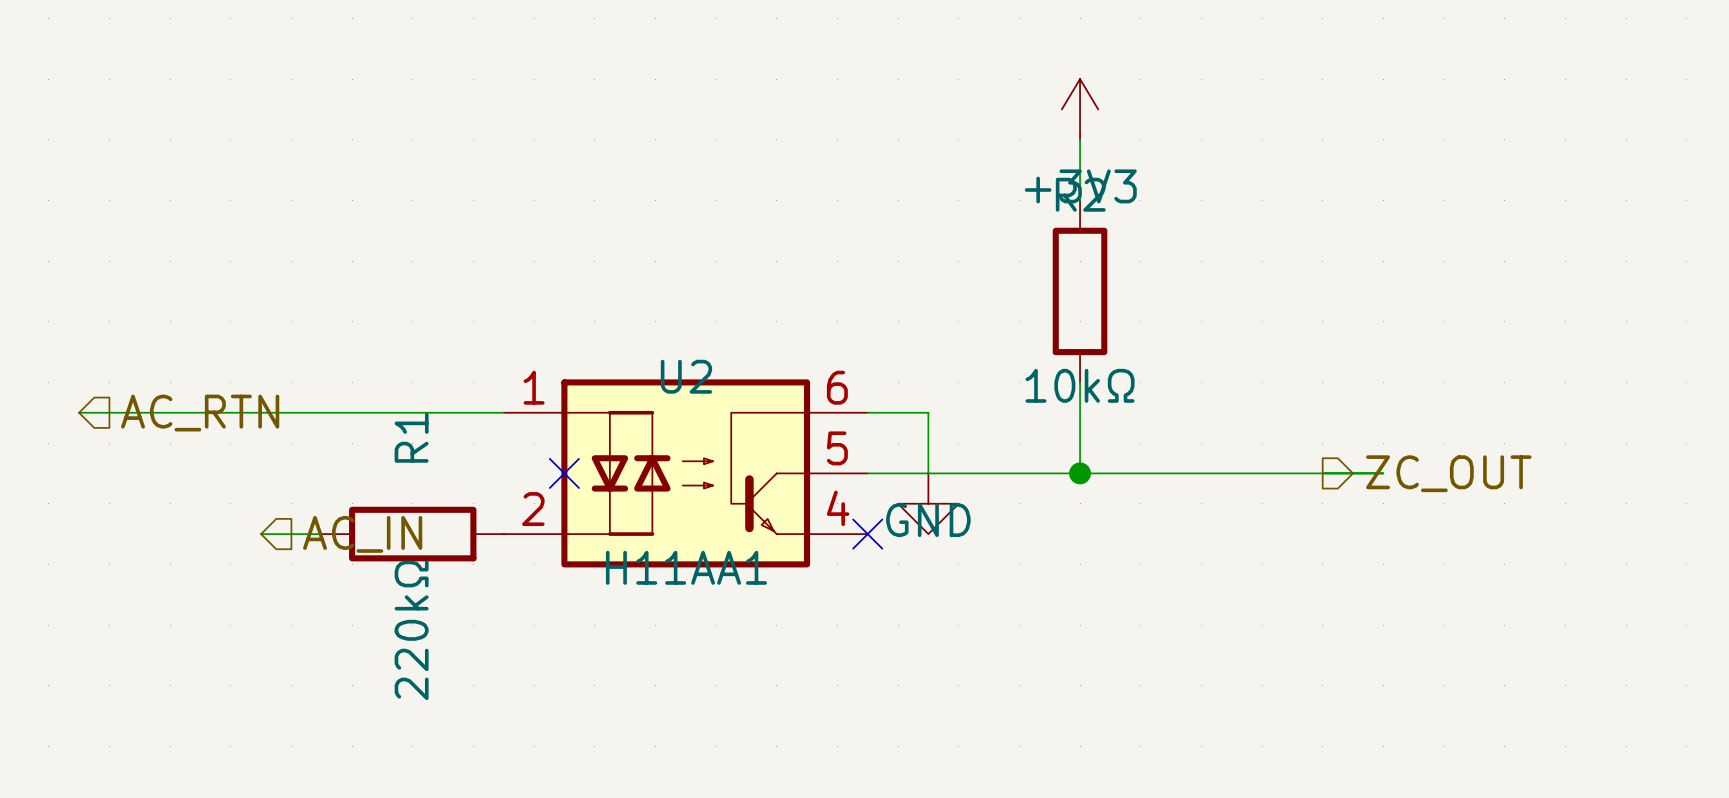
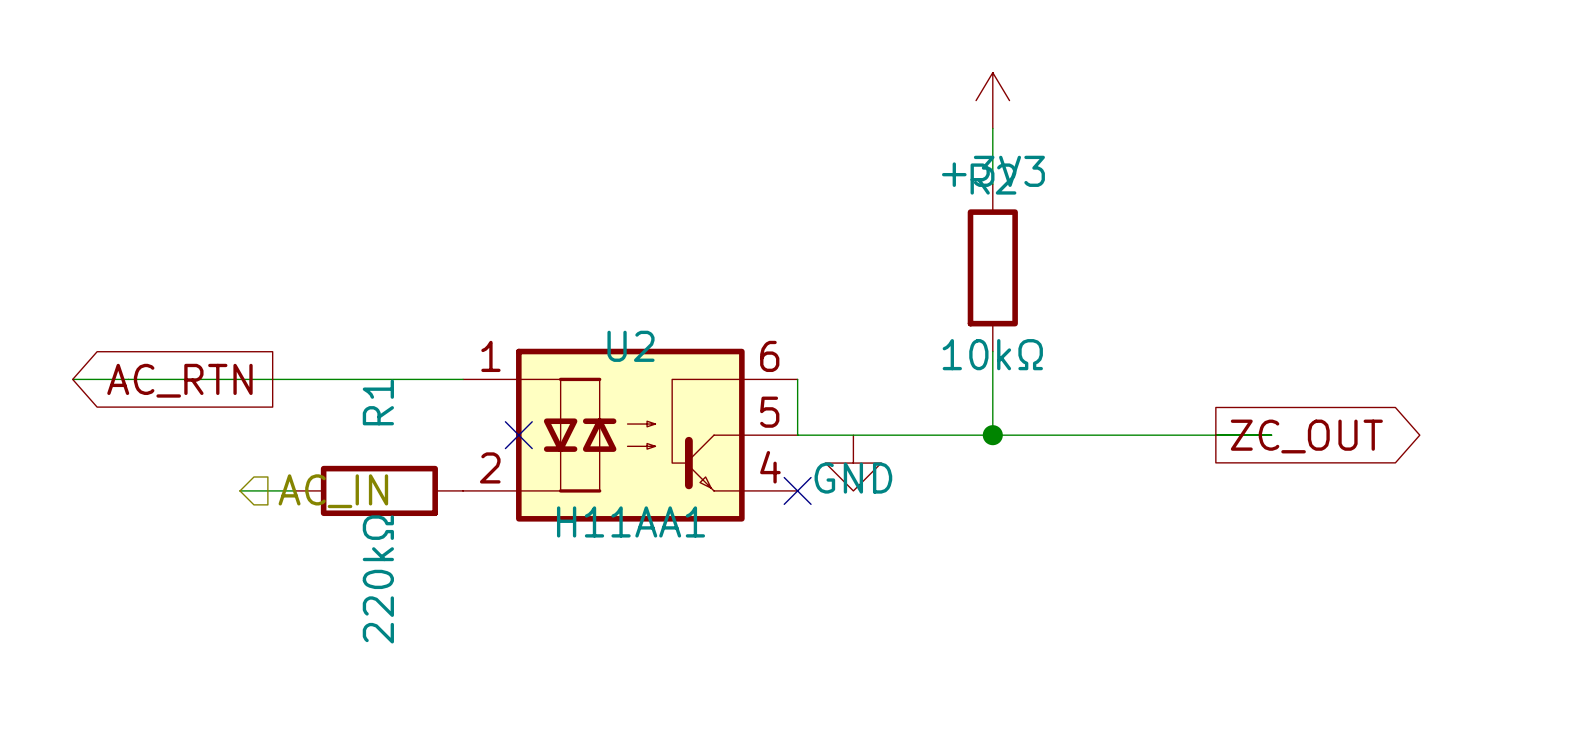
wire: (867, 412) (928, 412) (928, 473) -> (797, 379) (797, 435)
hierarchical label: AC_RTN (200, 413) -> none
global label: none -> AC_RTN (179, 380)
hierarchical label: ZC_OUT (1448, 473) -> none
global label: none -> ZC_OUT (1306, 436)

